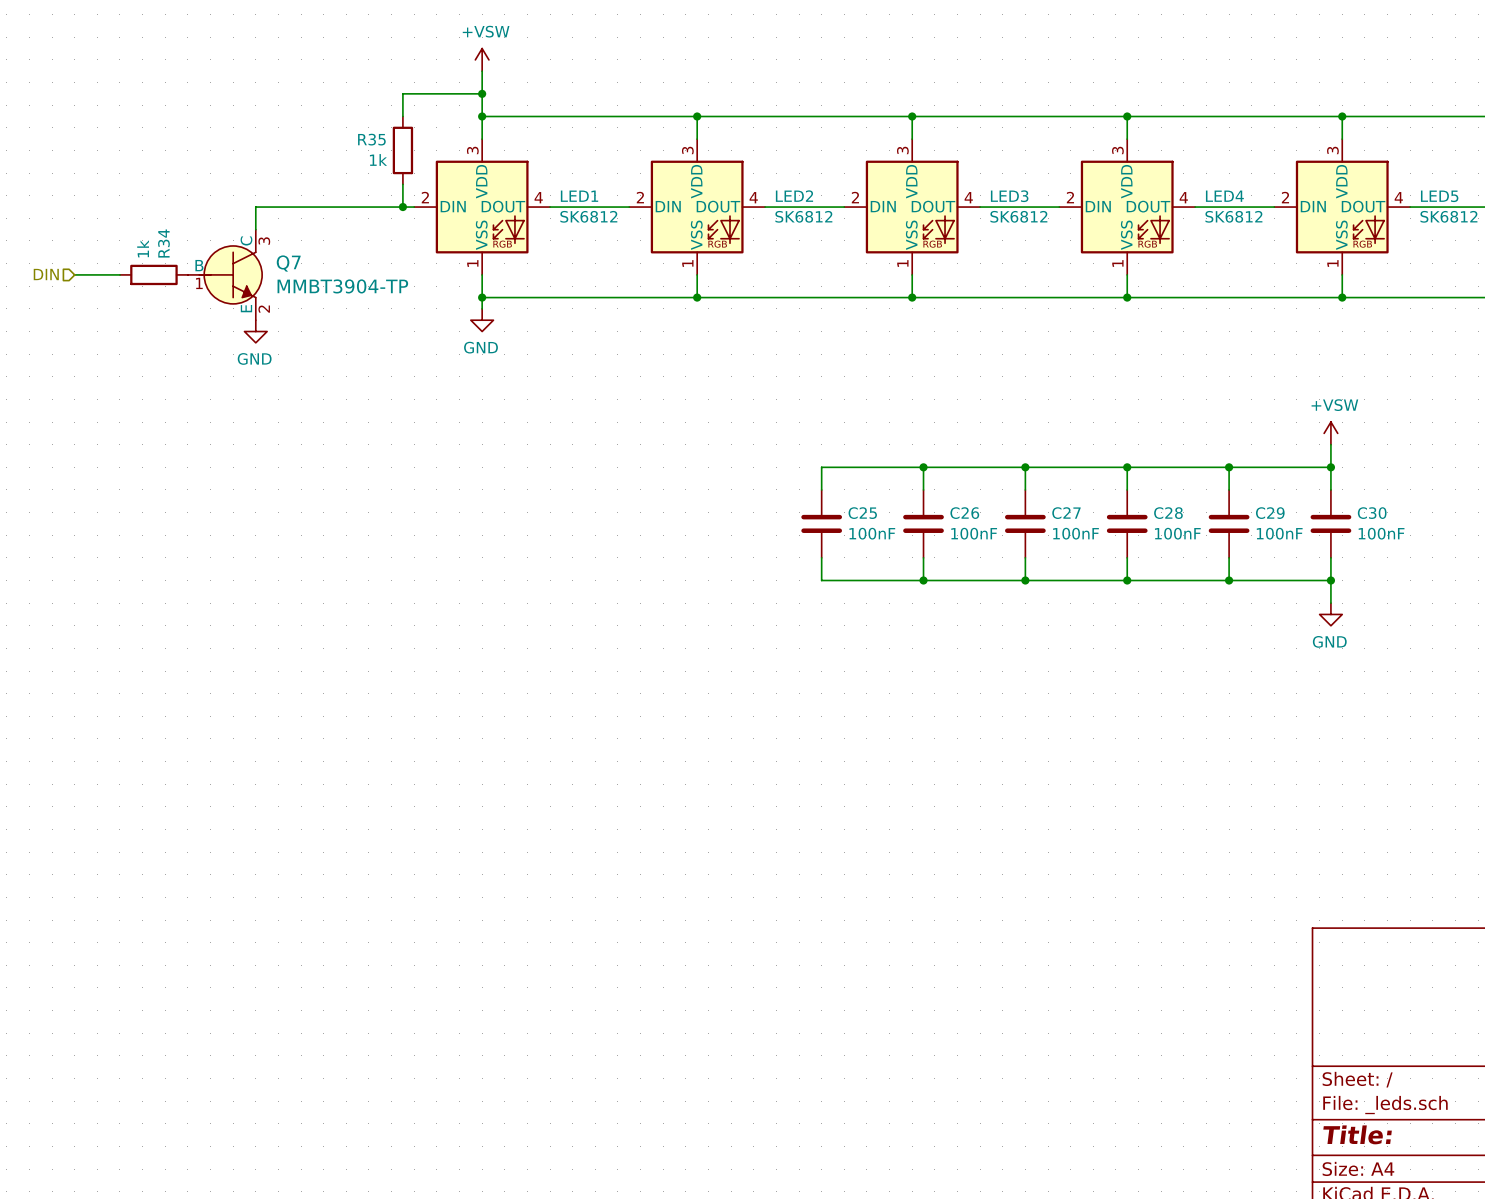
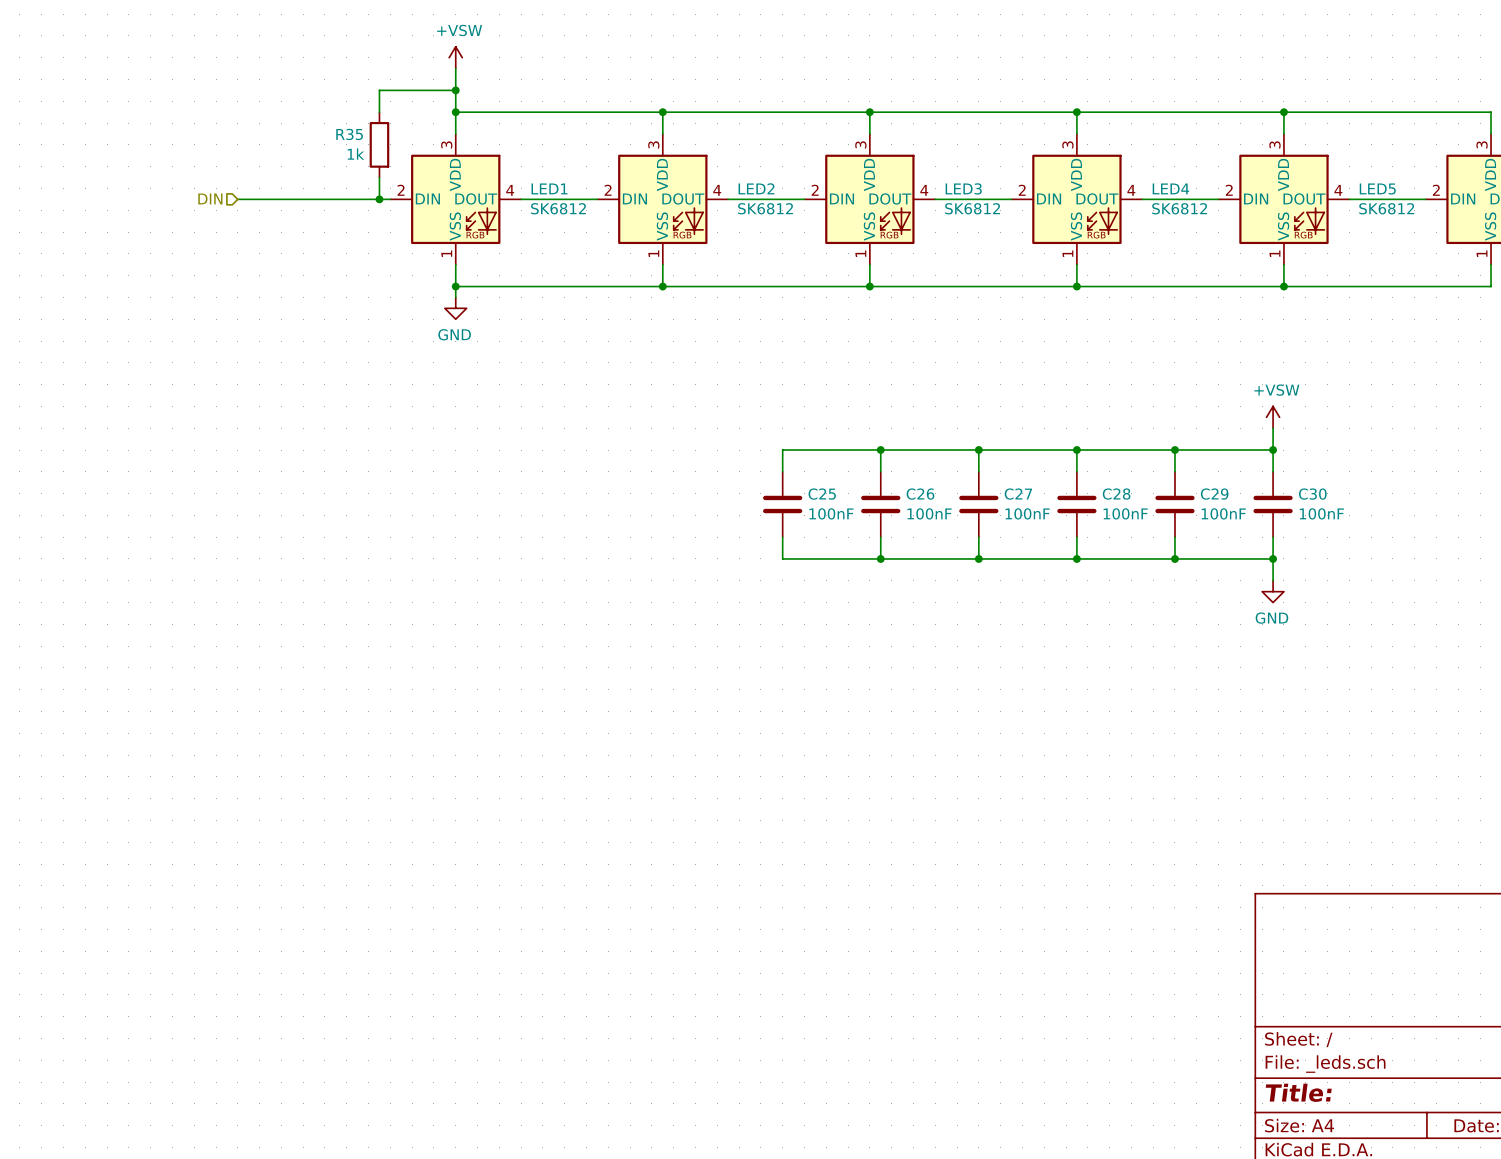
wire: (255, 207) (255, 229) -> none
hierarchical label position: DIN (46, 274) -> DIN (210, 198)
wire: (74, 274) (119, 274) -> none
R34: 1k (153, 274) -> none
Q7: MMBT3904-TP (225, 274) -> none
power symbol: GND (255, 331) -> none

